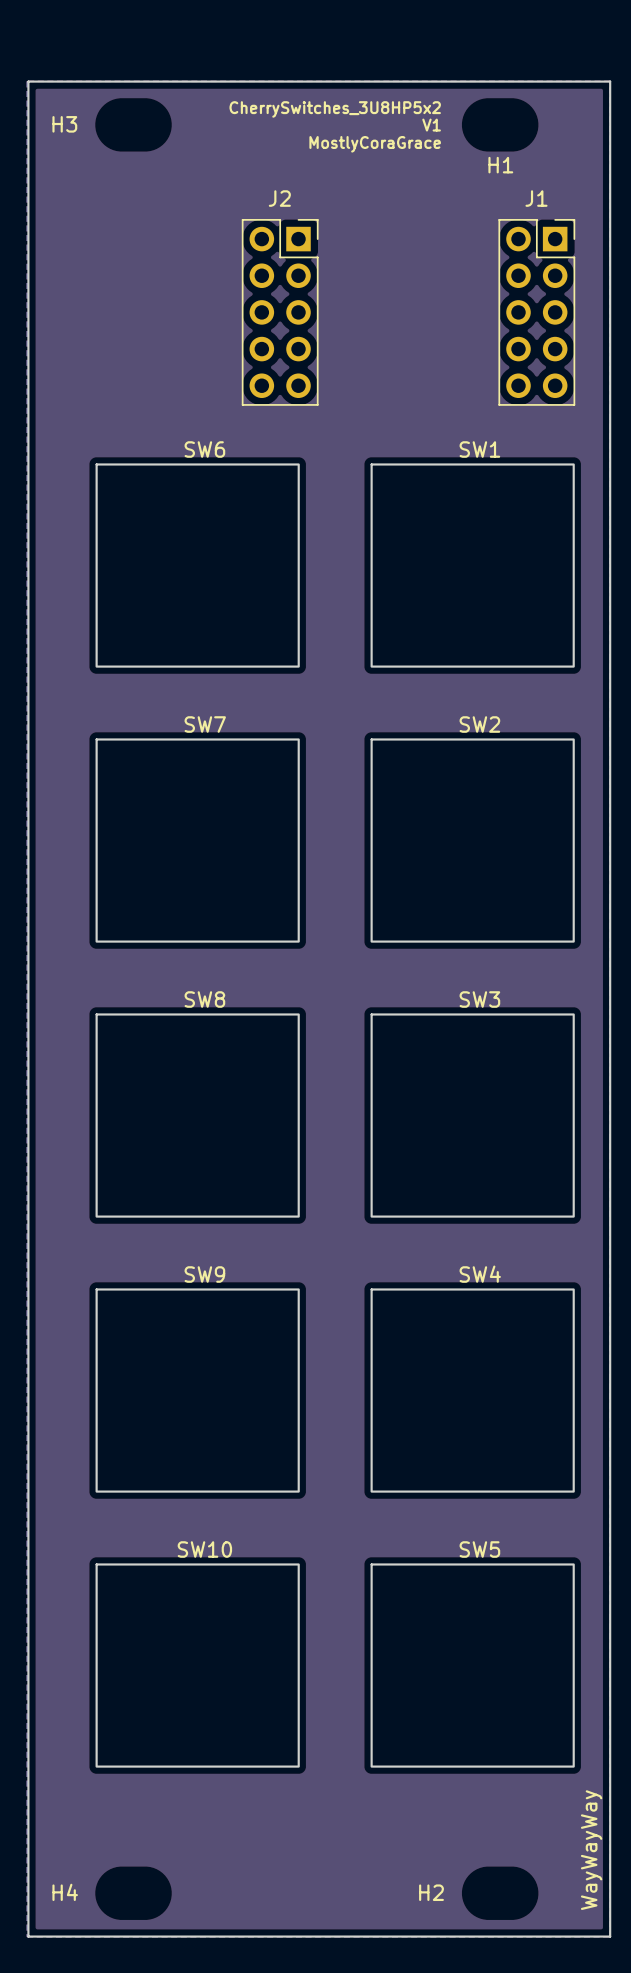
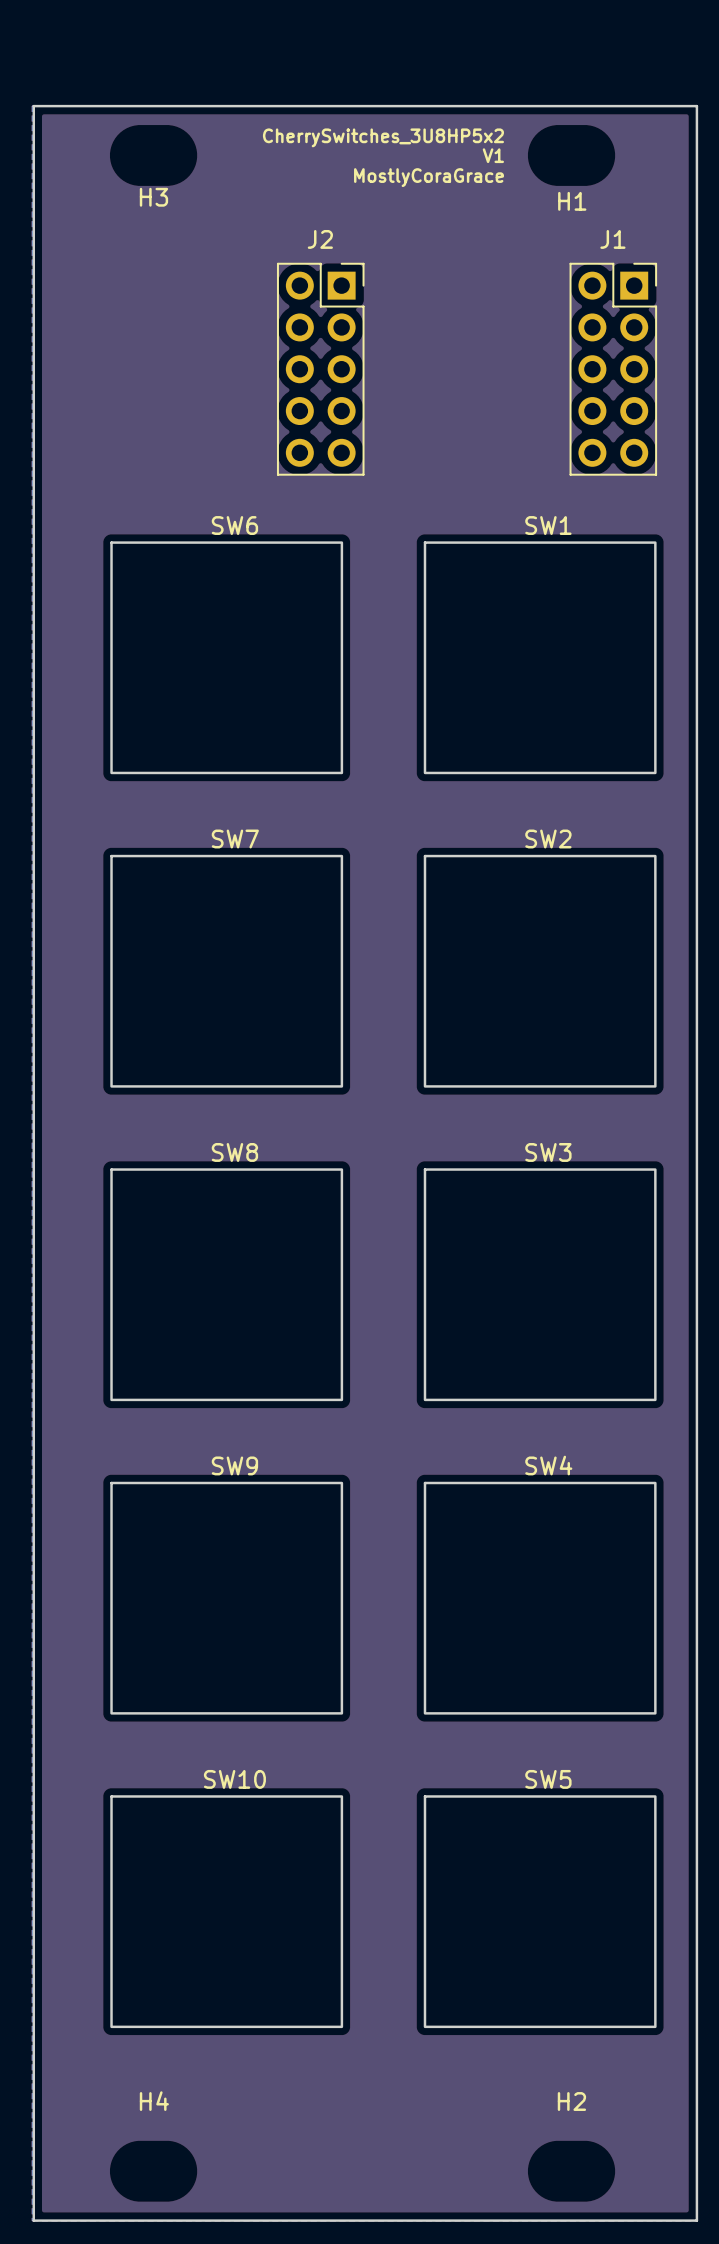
H3 name position: H3 (64, 124) -> H3 (153, 197)
text: WayWayWay (591, 1850) -> none
H4 name position: H4 (65, 1892) -> H4 (154, 2101)
H2 name position: H2 (431, 1892) -> H2 (571, 2101)

